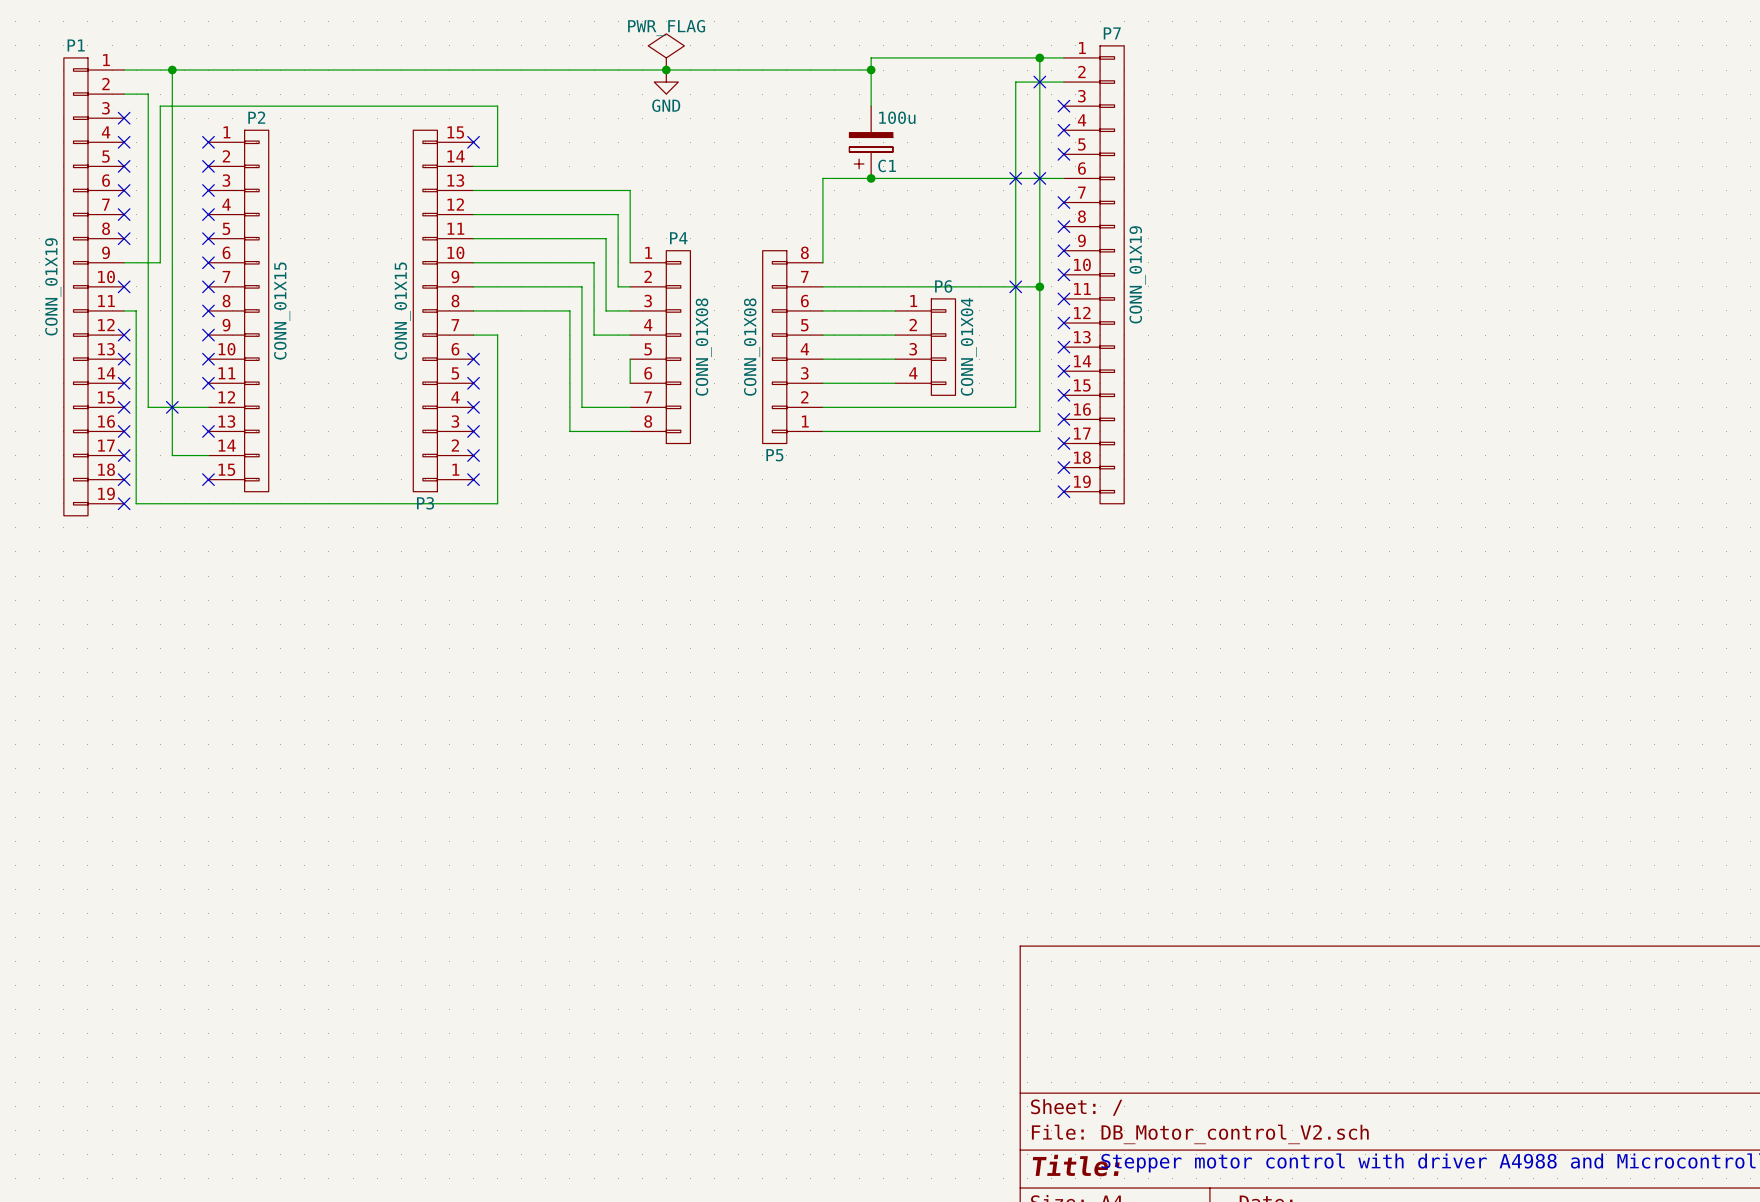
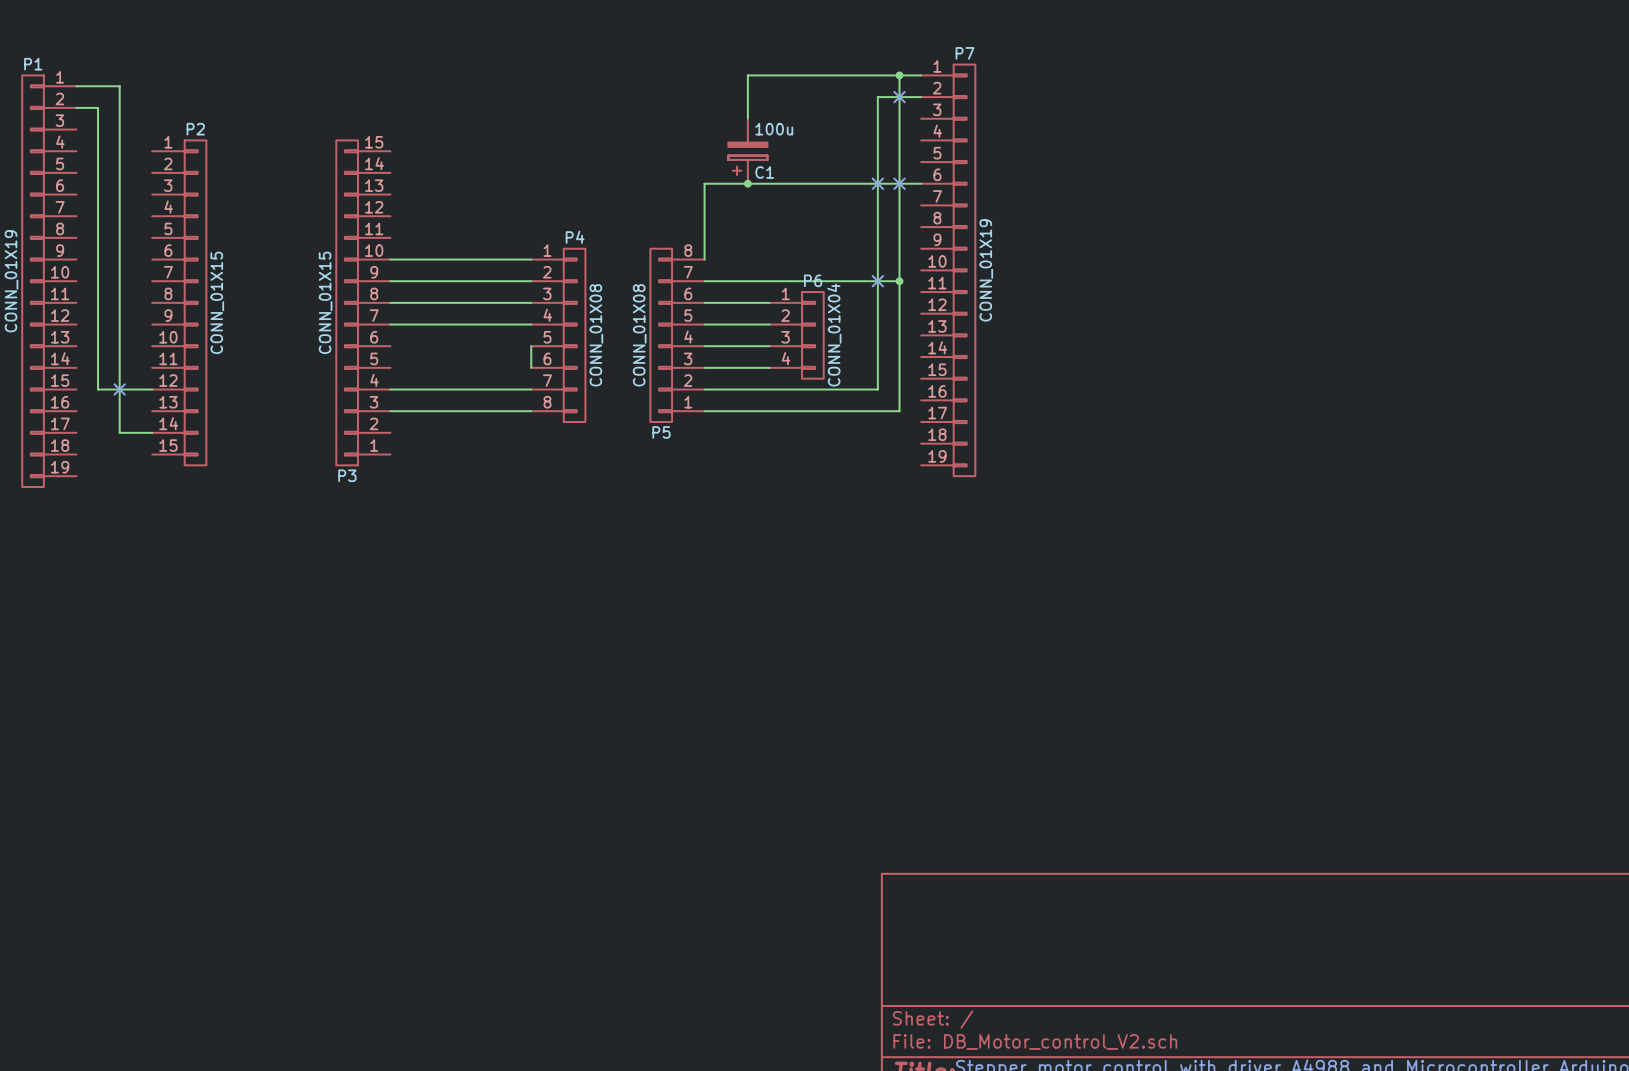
power symbol: PWR_FLAG (666, 51) -> none
wire: (172, 70) (871, 70) -> none
junction: (172, 70) -> none
junction: (666, 70) -> none
junction: (871, 70) -> none
power symbol: GND (666, 82) -> none
no-connect mark: (1063, 106) -> none
no-connect mark: (124, 118) -> none
no-connect mark: (1063, 130) -> none
no-connect mark: (124, 142) -> none
no-connect mark: (208, 142) -> none
no-connect mark: (473, 142) -> none
no-connect mark: (1063, 154) -> none
no-connect mark: (124, 166) -> none
no-connect mark: (208, 166) -> none
wire: (473, 166) (497, 166) (497, 106) (160, 106) (160, 262) (124, 262) -> none
no-connect mark: (124, 190) -> none
no-connect mark: (208, 190) -> none
wire: (473, 190) (630, 190) (630, 262) -> none
no-connect mark: (1063, 202) -> none
no-connect mark: (124, 214) -> none
no-connect mark: (208, 214) -> none
wire: (473, 214) (618, 214) (618, 286) -> none
no-connect mark: (1063, 226) -> none
no-connect mark: (124, 238) -> none
no-connect mark: (208, 238) -> none
wire: (473, 238) (606, 238) (606, 310) -> (477, 302) (509, 302)
no-connect mark: (1063, 250) -> none
no-connect mark: (208, 262) -> none
wire: (594, 262) (594, 335) -> (498, 259) (531, 259)
no-connect mark: (1063, 274) -> none
no-connect mark: (124, 286) -> none
no-connect mark: (208, 286) -> none
wire: (581, 286) (581, 407) -> (487, 281) (520, 281)
no-connect mark: (1063, 298) -> none
wire: (124, 310) (136, 310) (136, 503) (497, 503) (497, 335) -> (498, 324) (412, 324)
no-connect mark: (208, 310) -> none
wire: (569, 310) (569, 431) -> (390, 411) (477, 411)
no-connect mark: (1063, 323) -> none
no-connect mark: (124, 335) -> none
no-connect mark: (208, 335) -> none
no-connect mark: (1063, 347) -> none
no-connect mark: (124, 359) -> none
no-connect mark: (208, 359) -> none
no-connect mark: (473, 359) -> none
no-connect mark: (1063, 371) -> none
no-connect mark: (124, 383) -> none
no-connect mark: (208, 383) -> none
no-connect mark: (473, 383) -> none
no-connect mark: (1063, 395) -> none
no-connect mark: (124, 407) -> none
wire: none -> (390, 389) (487, 389)
no-connect mark: (473, 407) -> none
no-connect mark: (1063, 419) -> none
no-connect mark: (124, 431) -> none
no-connect mark: (208, 431) -> none
no-connect mark: (473, 431) -> none
no-connect mark: (1063, 443) -> none
no-connect mark: (124, 455) -> none
no-connect mark: (473, 455) -> none
no-connect mark: (1063, 467) -> none
no-connect mark: (124, 479) -> none
no-connect mark: (208, 479) -> none
no-connect mark: (473, 479) -> none
no-connect mark: (1063, 491) -> none
no-connect mark: (124, 503) -> none

